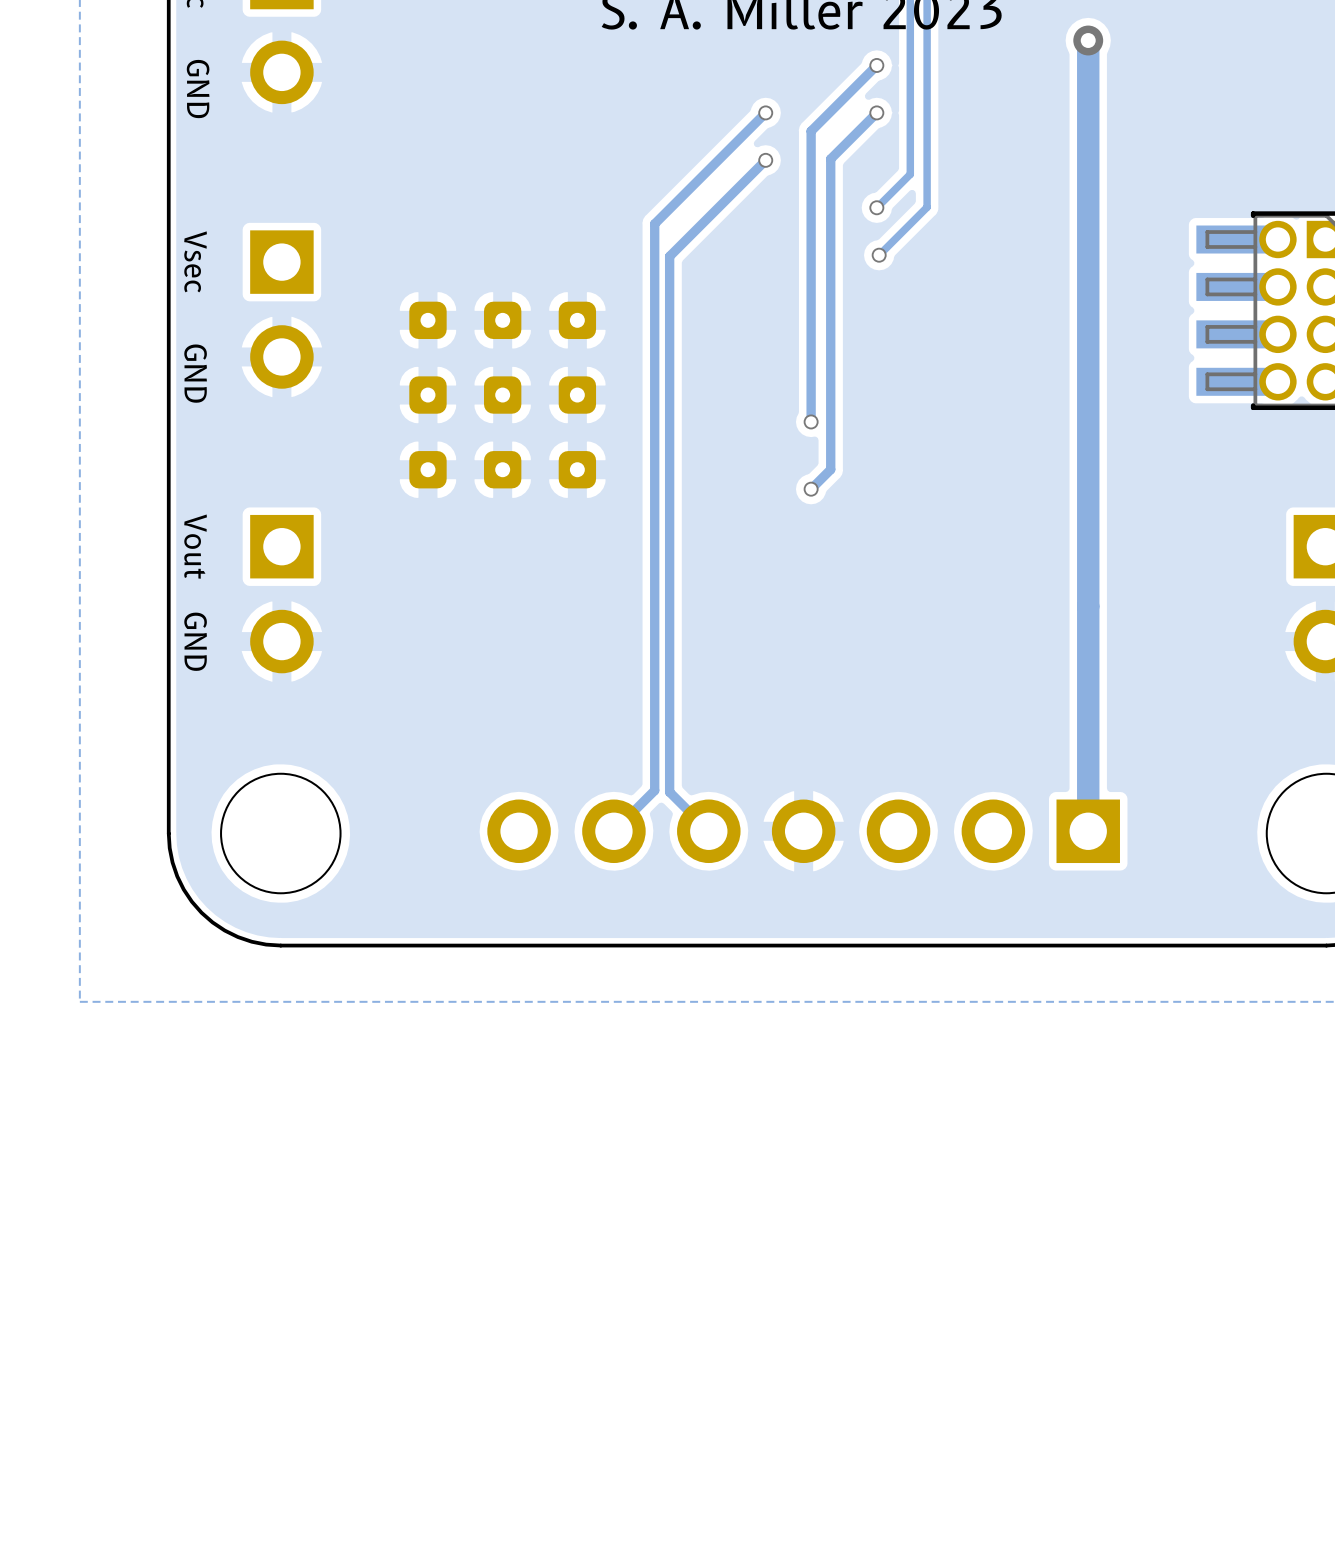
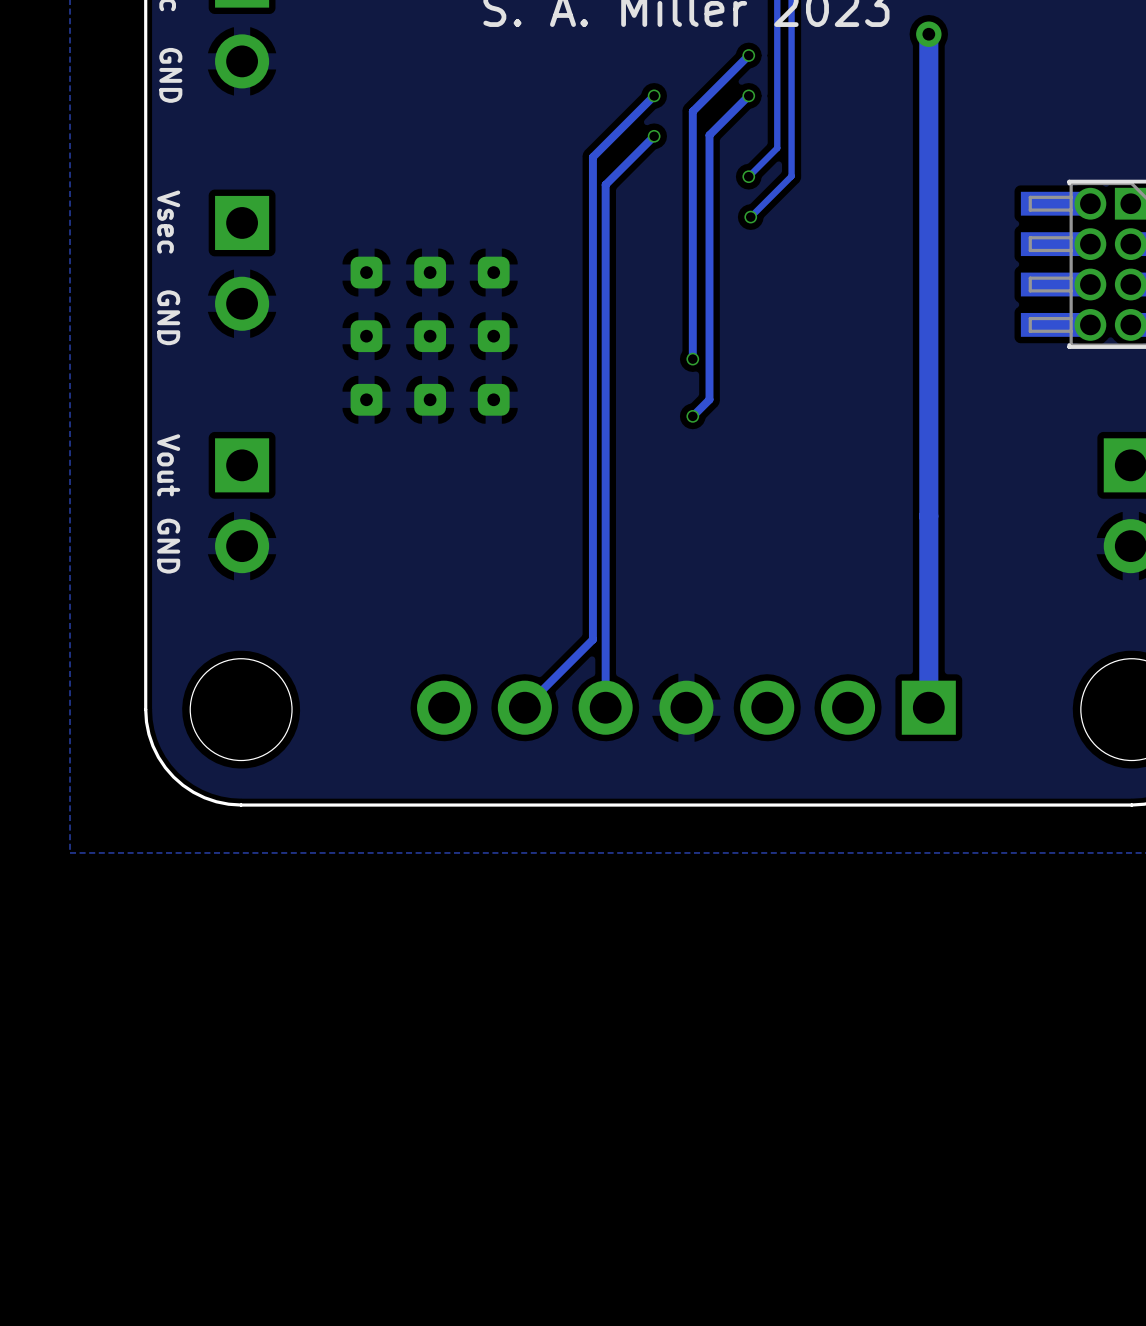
track: (693, 184) (654, 223) (654, 790) -> (592, 157) (592, 639) (559, 672)
track: (708, 217) (669, 256) (669, 792) (708, 831) -> (605, 184) (605, 707)

